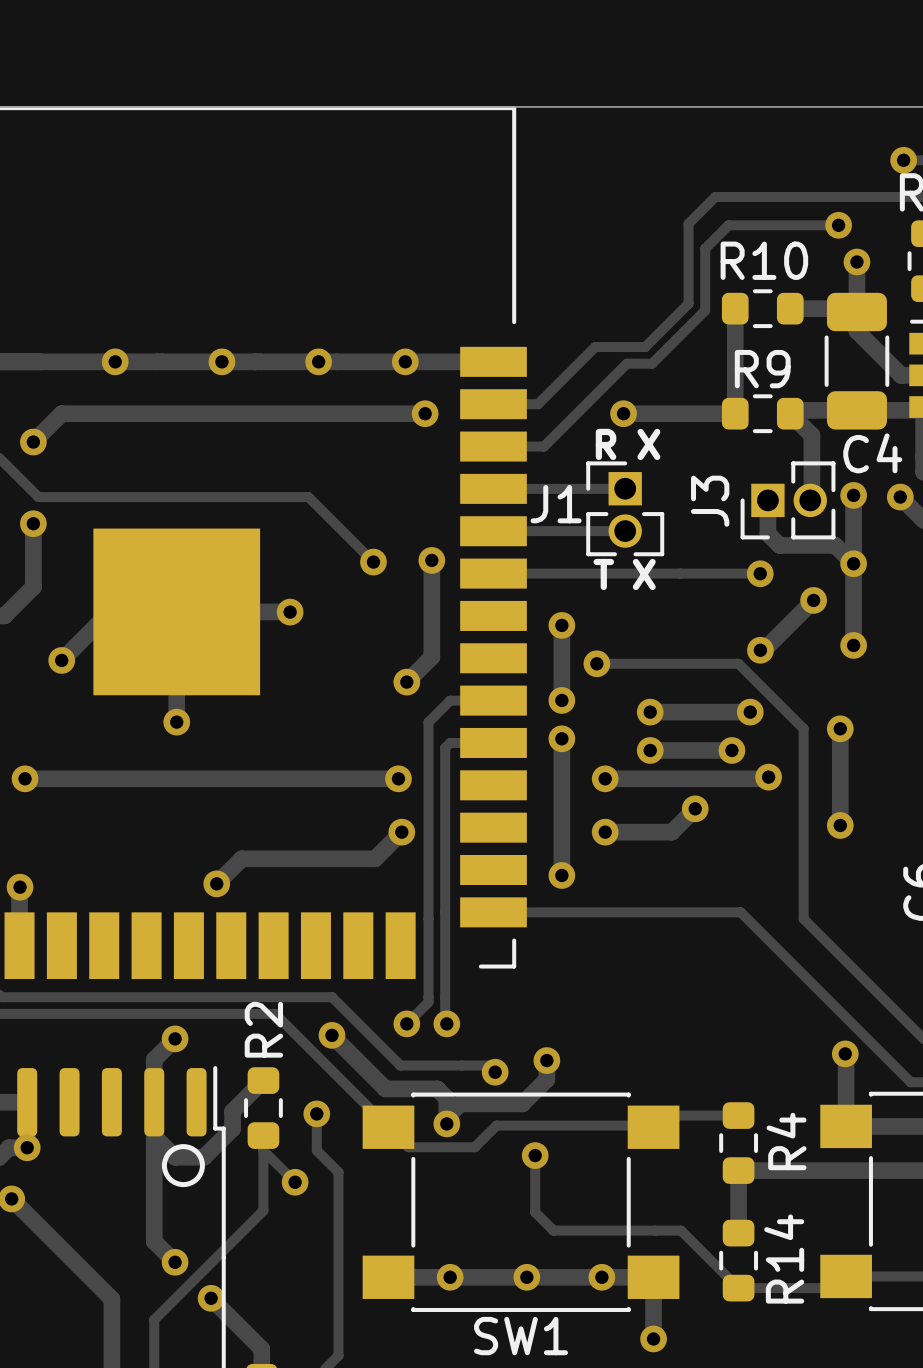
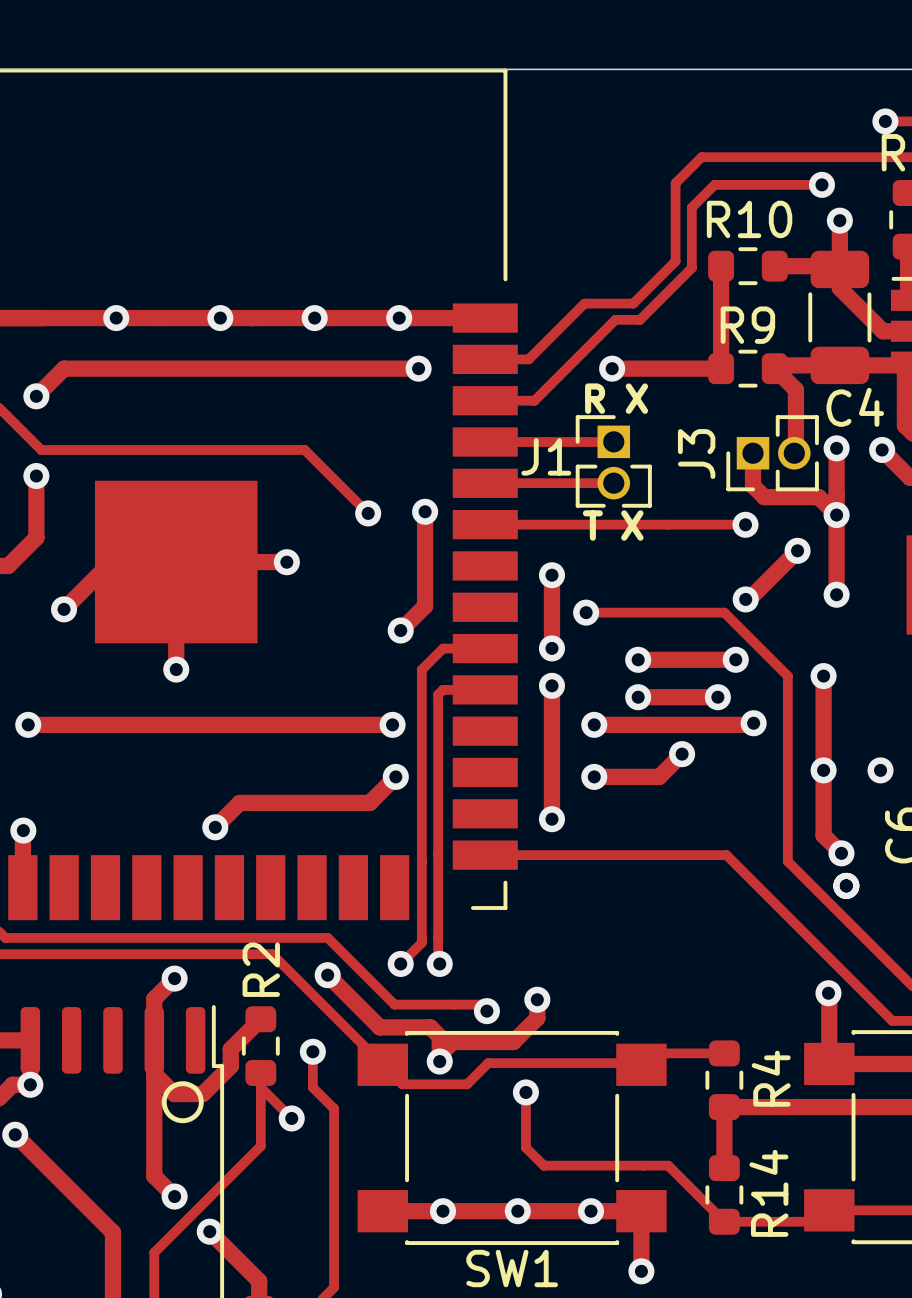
track: none -> (823, 770) (823, 835) (841, 853)
via: none -> (880, 770)
via: none -> (841, 853)
via: none -> (846, 885)

